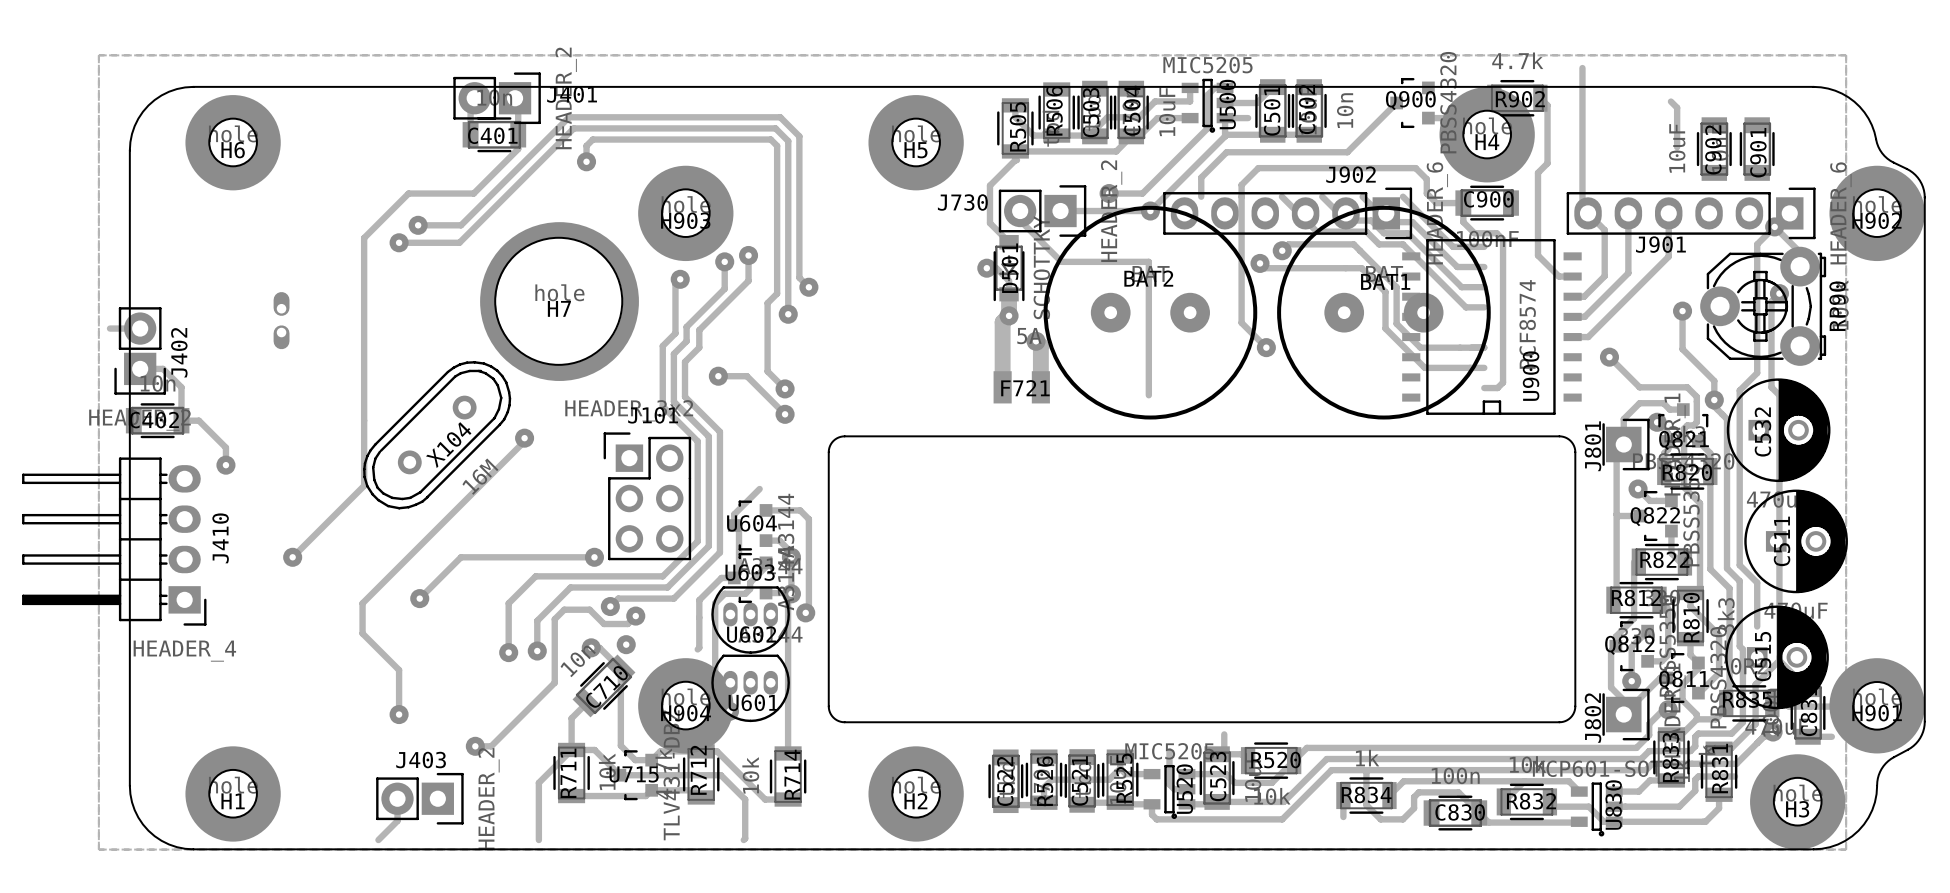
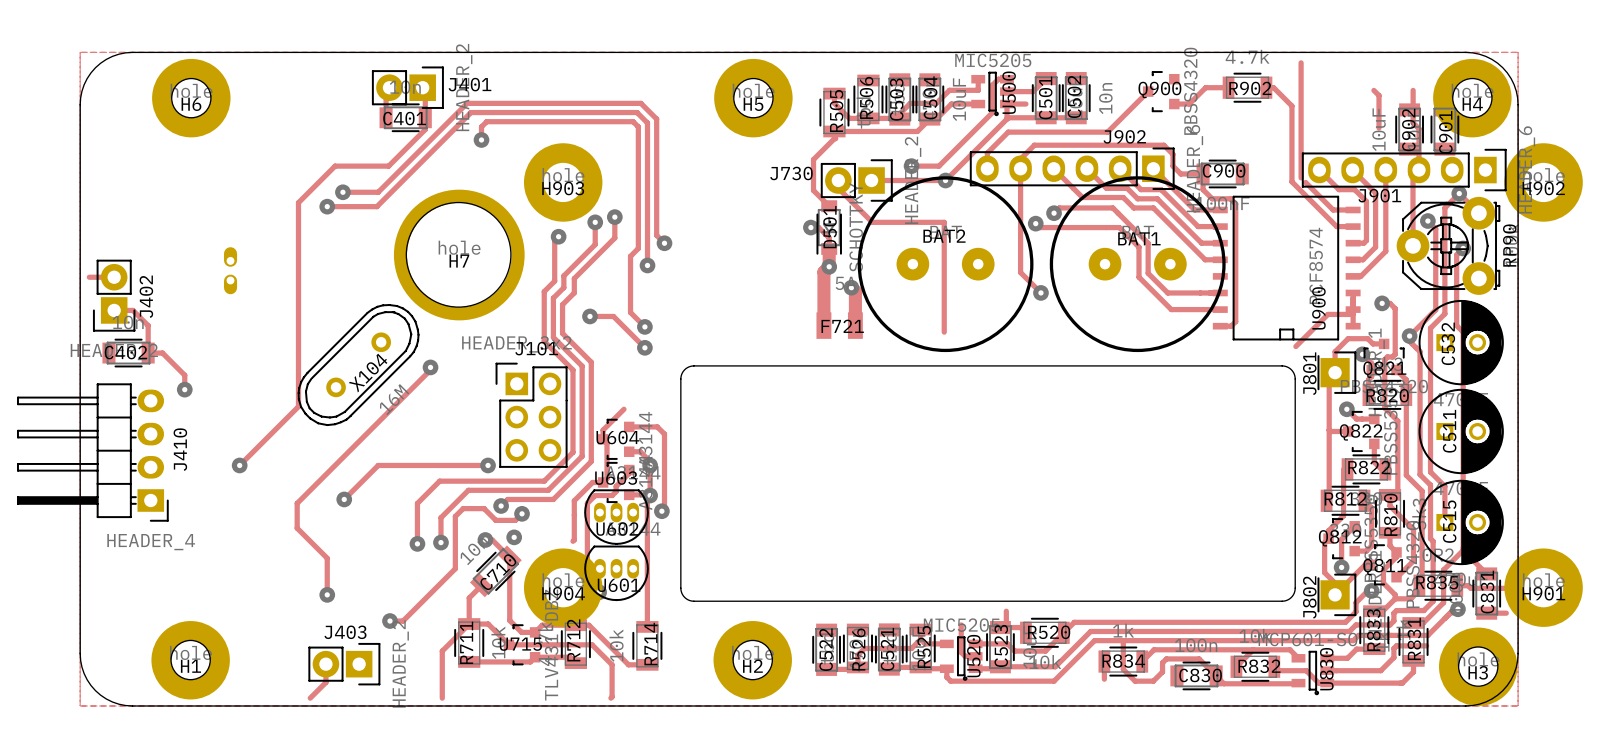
board edge: none -> (132, 52) (1465, 52) (1485, 56) (1497, 63) (1511, 78) (1516, 91) (1518, 104) (1518, 653) (1514, 673) (1507, 685) (1497, 695) (1479, 704) (1465, 705) (132, 705) (112, 702) (100, 695) (91, 685) (81, 667) (80, 653) (80, 104) (84, 84) (95, 67) (112, 56) (132, 52)
track: (1540, 98) (1547, 105) (1547, 163) (1537, 172) (1537, 255) (1559, 276) (1572, 276) -> (1266, 87) (1273, 87) (1291, 106) (1291, 181) (1336, 226) (1353, 226)
track: none -> (1413, 90) (1413, 122) (1419, 128) (1419, 170) (1413, 176) (1413, 245)
round board edge: [1462, 109, 1512, 160] -> none
H4 position: (1487, 134) -> (1472, 98)
board edge: (1876, 139) (1868, 118) (1854, 101) (1835, 90) (1813, 86) (193, 86) (169, 91) (154, 100) (142, 111) (132, 133) (129, 150) (129, 785) (134, 810) (148, 830) (169, 844) (193, 849) (1813, 849) (1837, 844) (1858, 830) (1872, 810) (1877, 785) -> none
board edge: (1876, 139) (1880, 150) (1887, 158) (1909, 170) (1917, 177) (1922, 186) (1924, 197) -> none
H6 position: (233, 142) -> (191, 98)
round board edge position: (233, 142) -> (191, 98)
H5 position: (916, 142) -> (753, 98)
round board edge position: (916, 142) -> (753, 98)
round board edge: [661, 188, 711, 238] -> none
board edge: (1924, 197) (1924, 721) -> none
track: none -> (1319, 170) (1339, 189) (1354, 189) (1366, 201) (1366, 240) (1363, 243) (1353, 243)
track: none -> (1352, 170) (1375, 193) (1375, 247) (1362, 259) (1353, 259)
track: none -> (1385, 170) (1385, 251) (1360, 276) (1353, 276)
J902 position: (1287, 213) -> (1072, 168)
track: (1628, 213) (1628, 273) (1584, 316) (1572, 316) -> none
track: (1668, 213) (1668, 256) (1588, 337) (1572, 337) -> none
J901 position: (1691, 213) -> (1404, 170)
round board edge position: (1877, 213) -> (1472, 98)
track: (1604, 230) (1604, 276) (1584, 296) (1572, 296) -> (1319, 196) (1333, 209) (1353, 209)
via: none -> (1427, 221)
RP90 position: (1763, 306) -> (1448, 245)
track: (1682, 311) (1682, 349) (1714, 380) (1714, 400) -> (1427, 221) (1435, 228) (1435, 309) (1409, 336)
via: (1682, 311) -> none
U900 position: (1491, 326) -> (1286, 268)
track: none -> (1353, 292) (1353, 326)
track: (1609, 357) (1639, 387) (1687, 387) (1696, 396) -> (1382, 303) (1389, 303) (1395, 308) (1395, 333)
via: (1609, 357) -> none
via: none -> (1382, 303)
track: none -> (1353, 314) (1327, 314) (1295, 346)
C532 position: (1778, 430) -> (1461, 342)
C511 position: (1796, 541) -> (1461, 431)
C515 position: (1777, 657) -> (1461, 522)
round board edge: [661, 680, 711, 731] -> none
round board edge: [1852, 681, 1902, 731] -> none
board edge: (1924, 721) (1923, 731) (1918, 740) (1910, 747) (1885, 763) (1880, 771) (1877, 785) -> none

